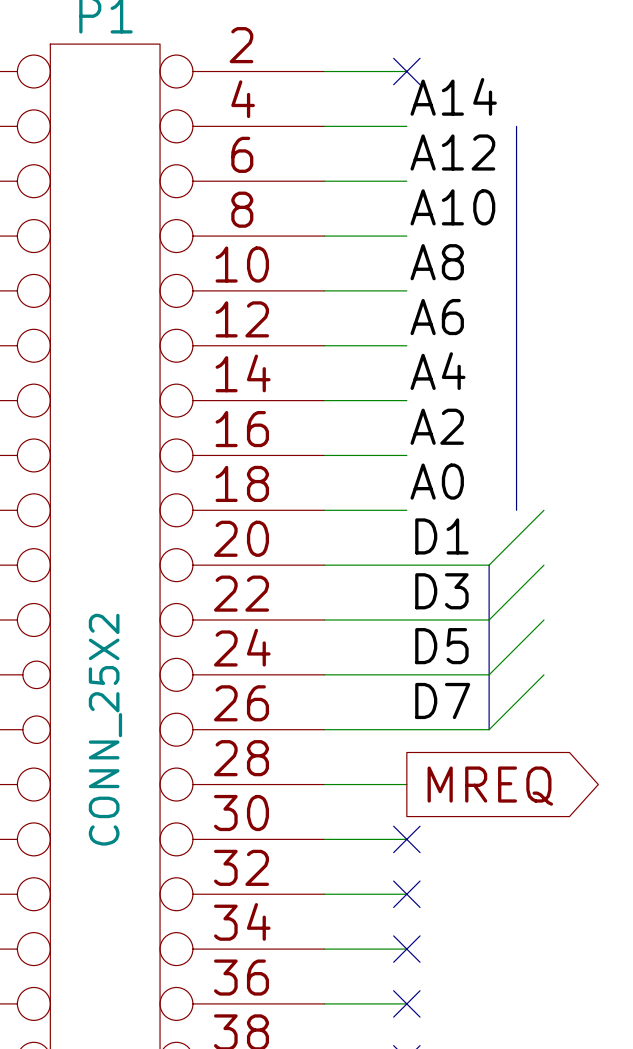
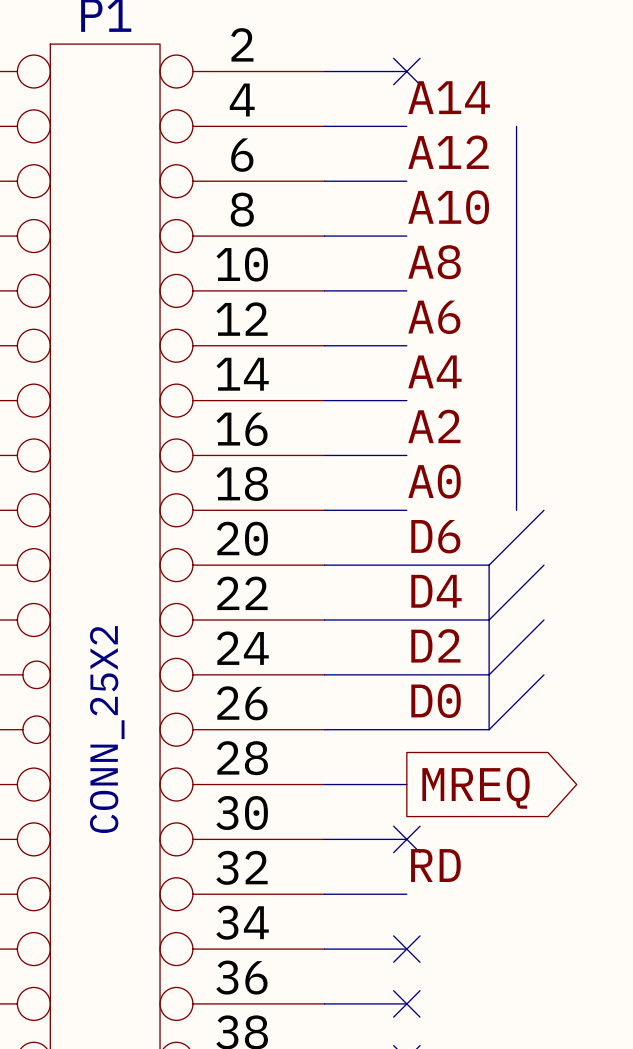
label: D1 (441, 536) -> D6 (435, 536)
label: D3 (441, 591) -> D4 (436, 591)
label: D5 (441, 646) -> D2 (435, 645)
label: D7 (442, 700) -> D0 (436, 700)
label: none -> RD (435, 865)
no-connect mark: (406, 894) -> none

